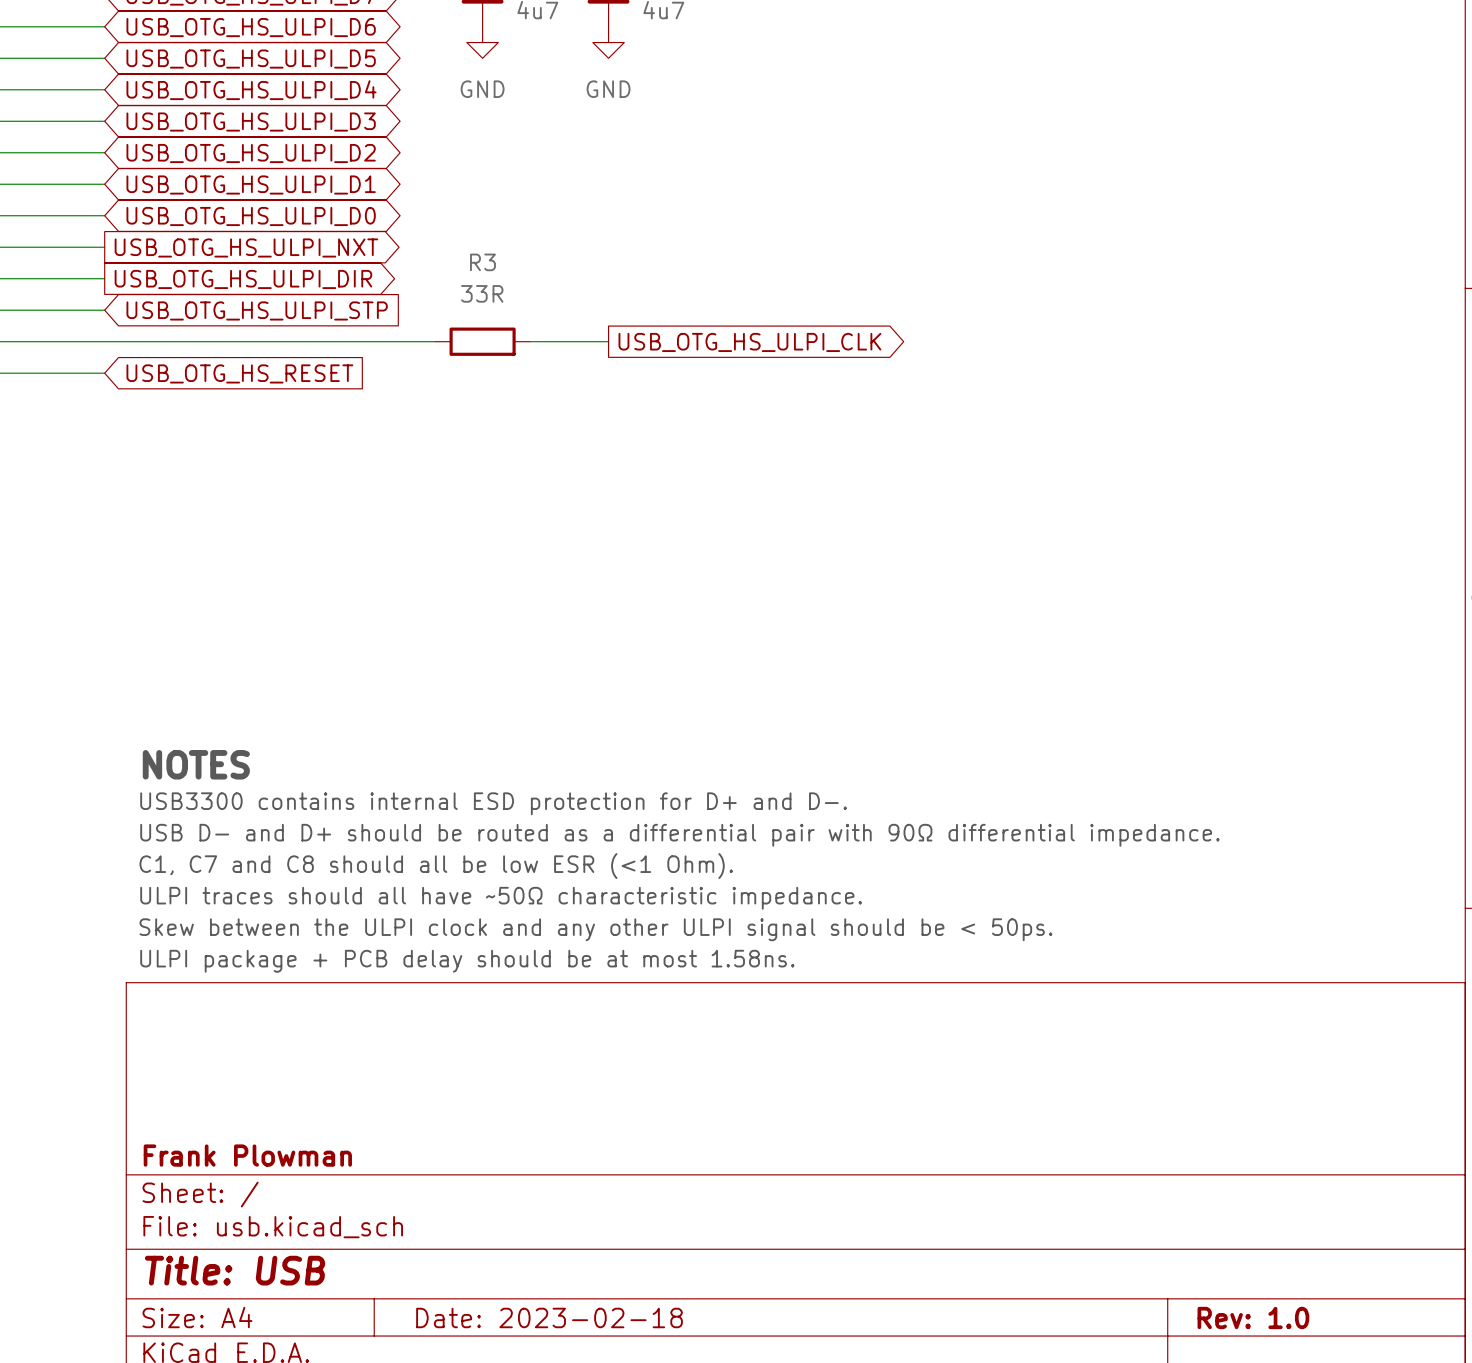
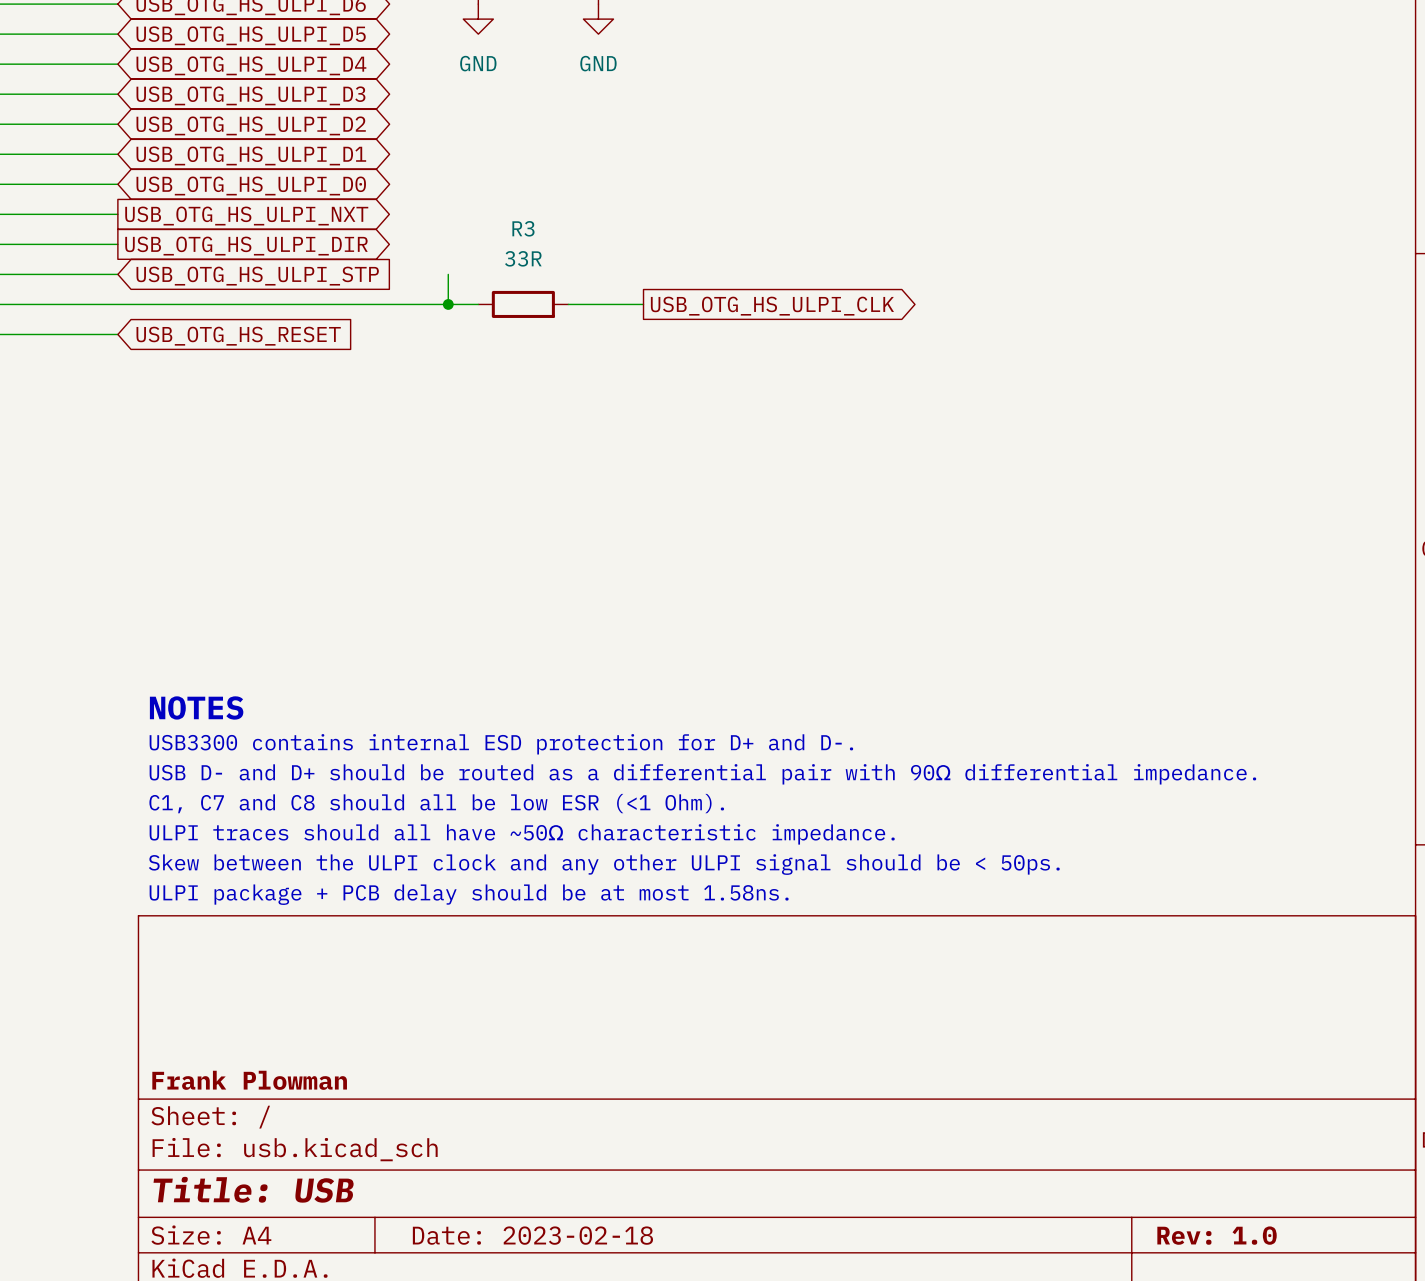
wire: none -> (448, 274) (448, 304)
wire: none -> (433, 304) (478, 304)
junction: none -> (448, 304)
R3 position: (482, 341) -> (523, 304)
wire: (529, 341) (577, 341) -> (598, 304) (643, 304)
global label position: USB_OTG_HS_ULPI_CLK (749, 342) -> USB_OTG_HS_ULPI_CLK (772, 306)

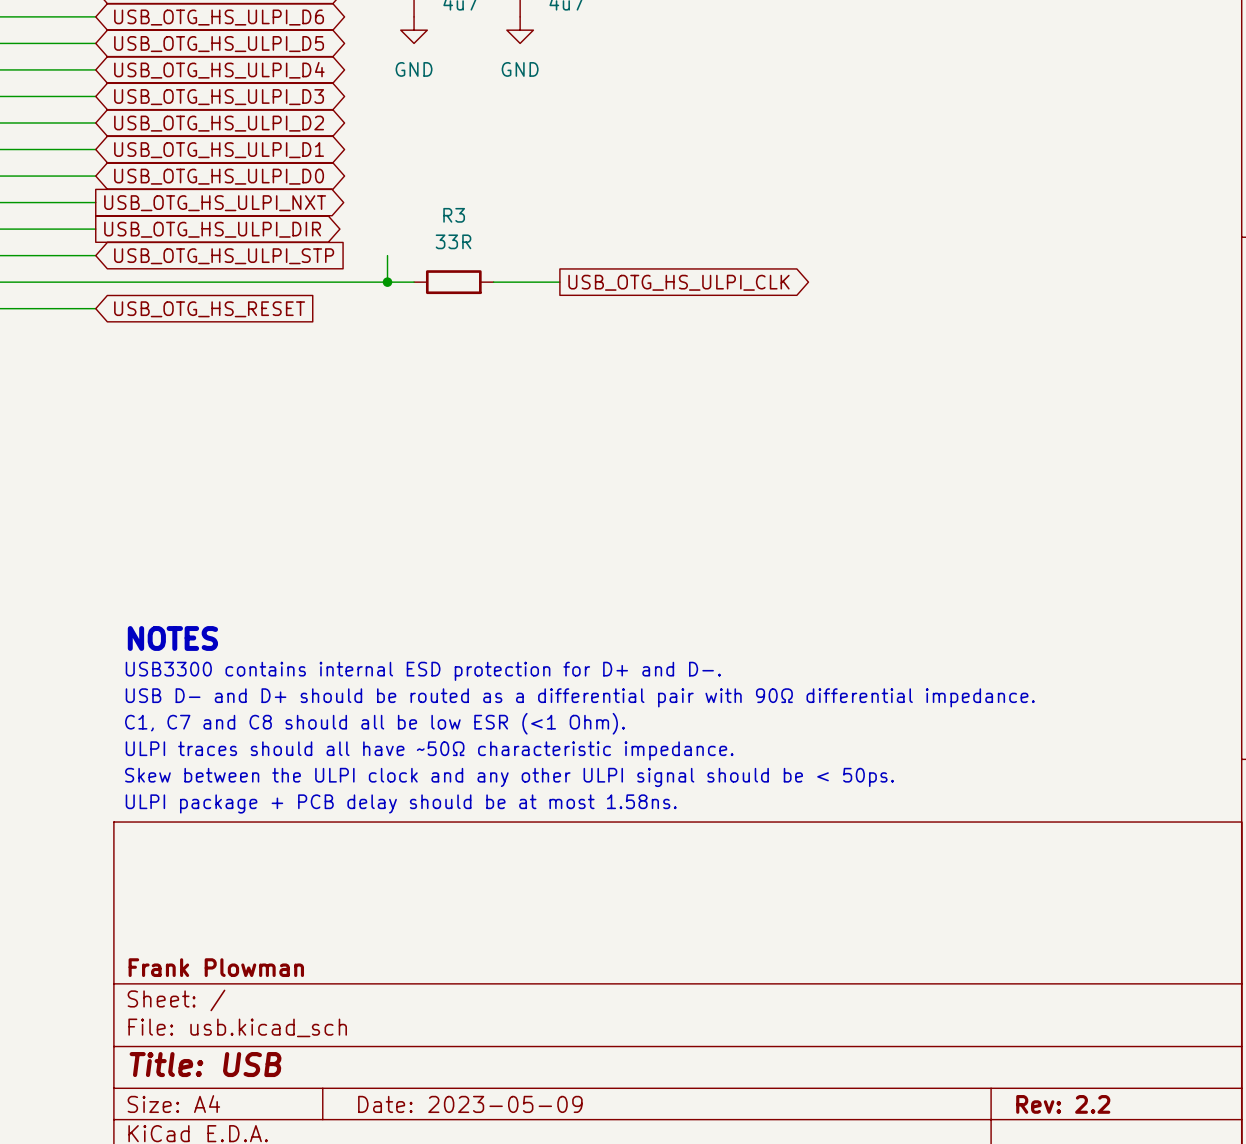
title block: Date: 2023-02-18 (532, 1235) -> Date: 2023-05-09 (470, 1104)
title block: Rev: 1.0 (1217, 1235) -> Rev: 2.2 (1063, 1104)

